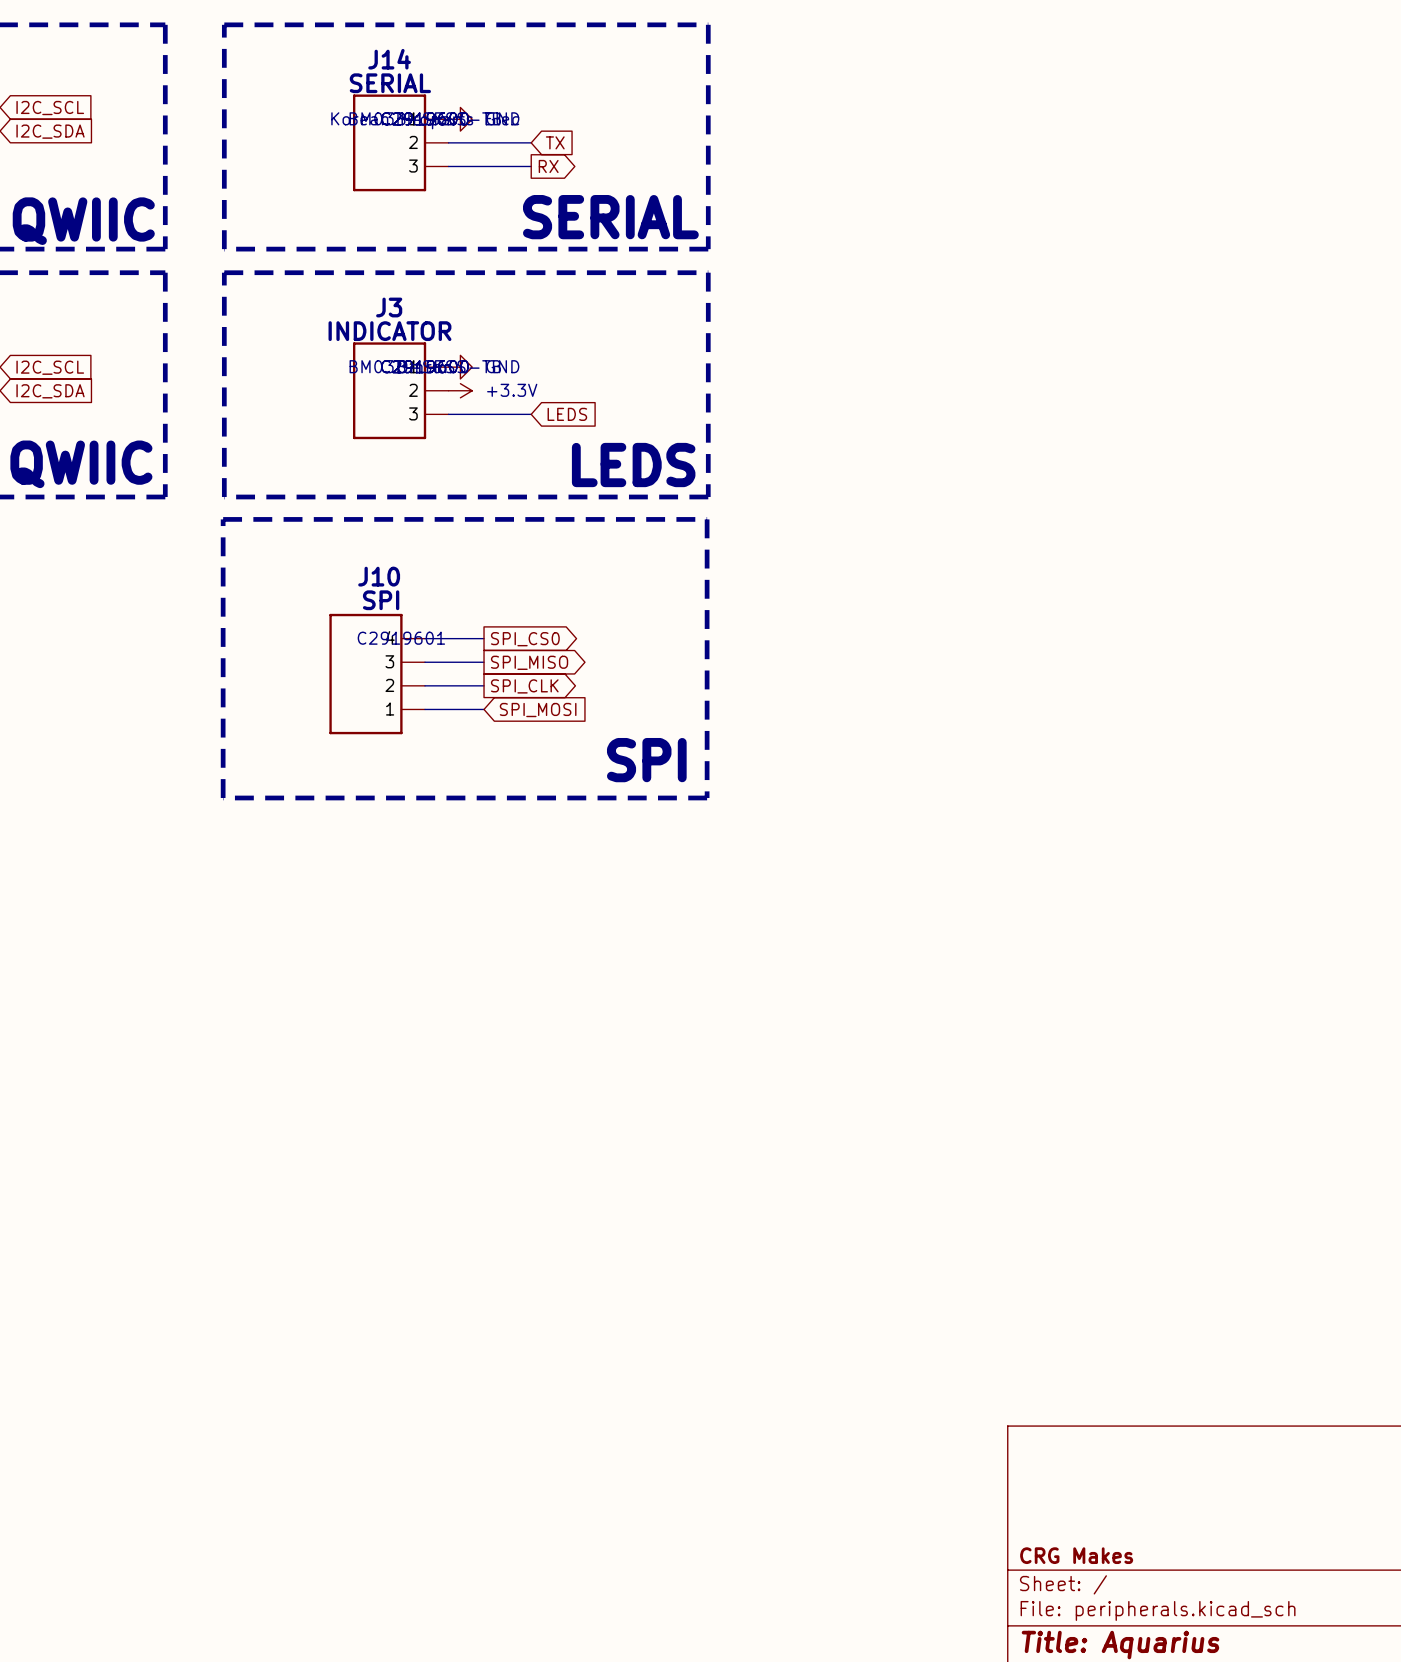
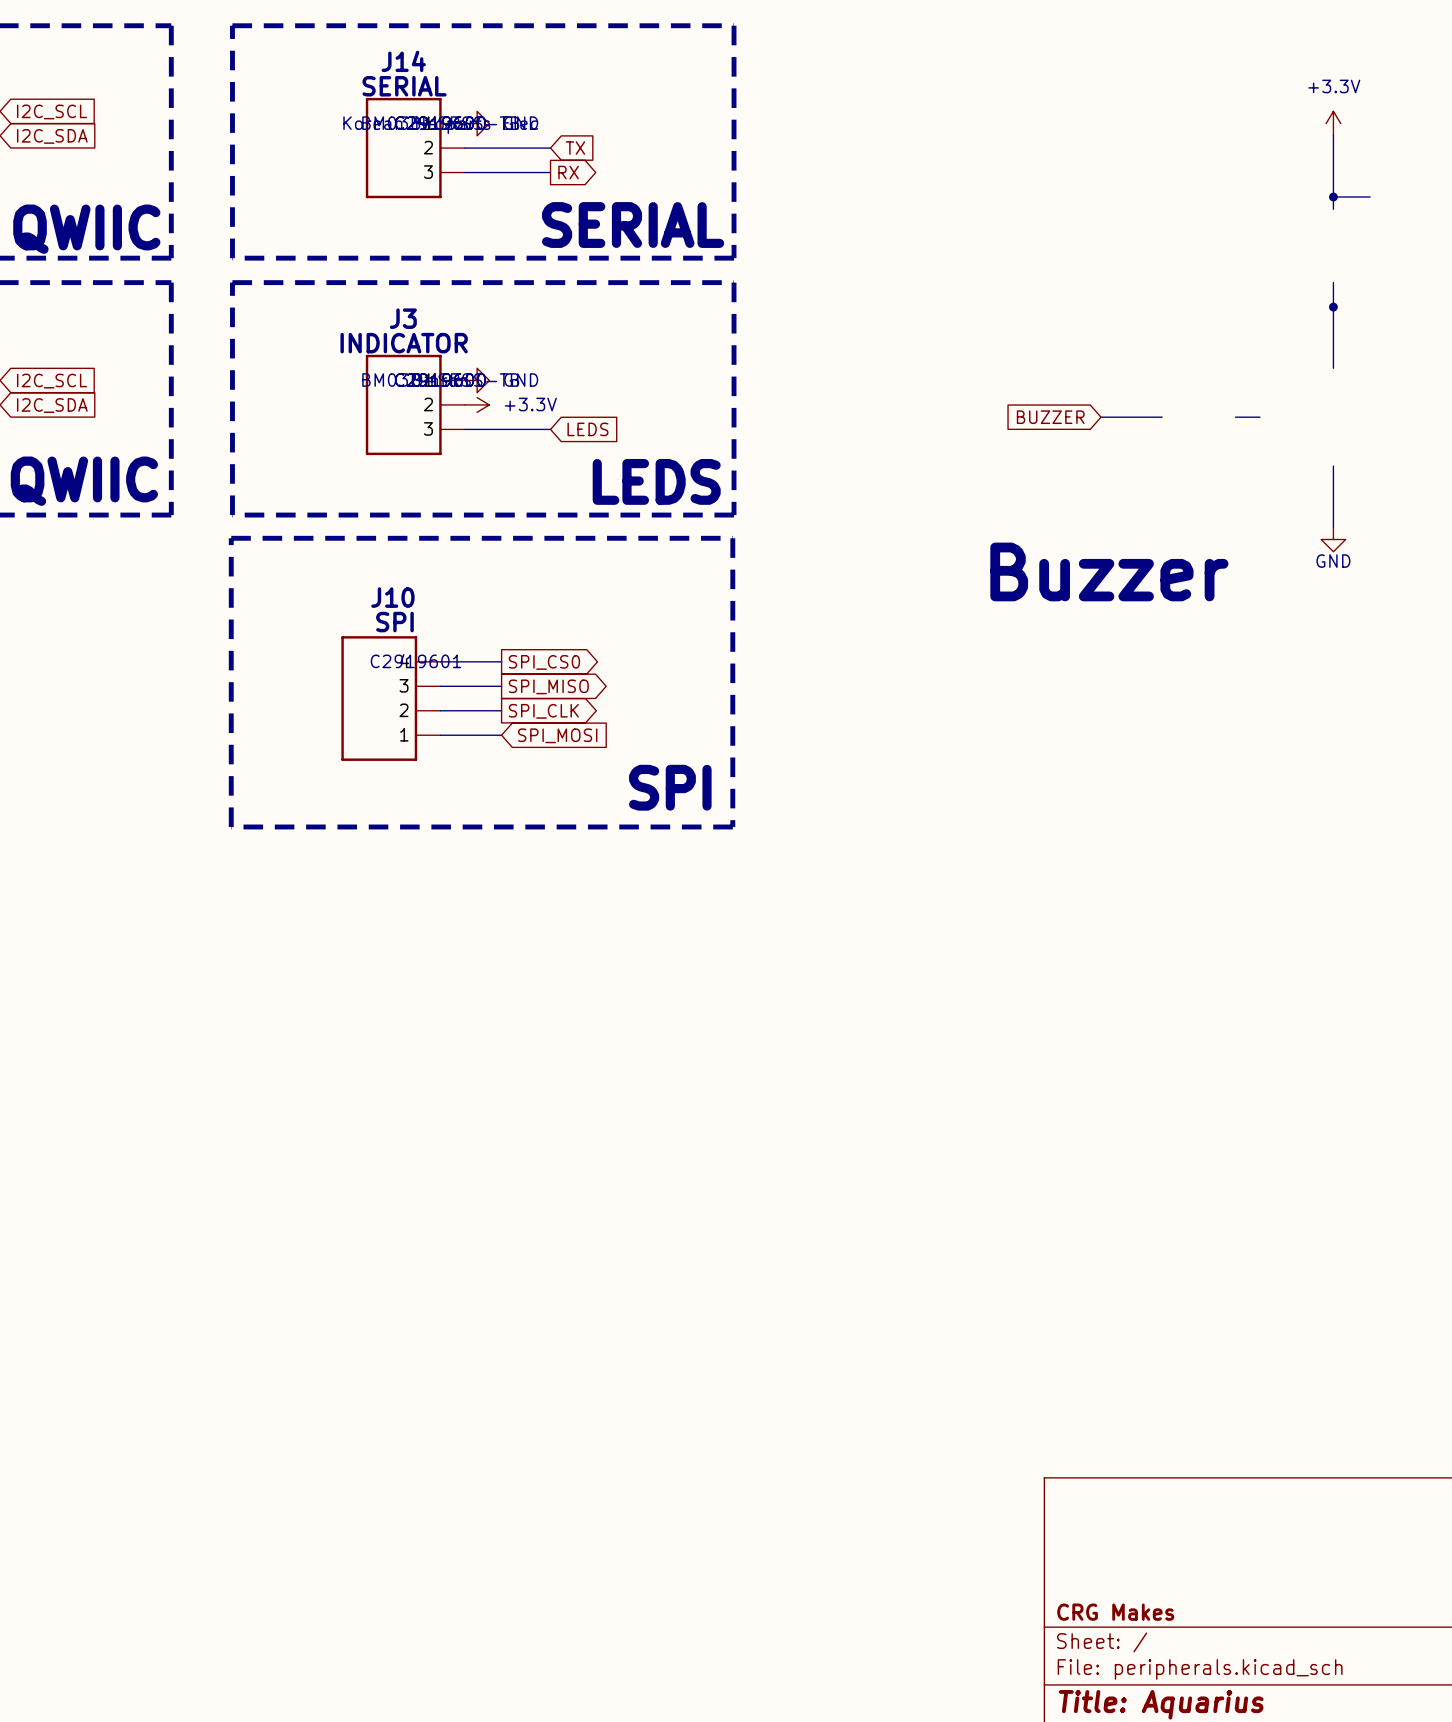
power symbol: none -> +3.3V (1333, 123)
wire: none -> (1333, 135) (1333, 209)
wire: none -> (1333, 196) (1370, 196)
junction: none -> (1333, 196)
wire: none -> (1333, 282) (1333, 368)
junction: none -> (1333, 307)
global label: none -> BUZZER (1050, 417)
wire: none -> (1101, 417) (1162, 417)
wire: none -> (1235, 417) (1260, 417)
wire: none -> (1333, 466) (1333, 527)
power symbol: none -> GND (1333, 539)
text: none -> Buzzer (1109, 571)

